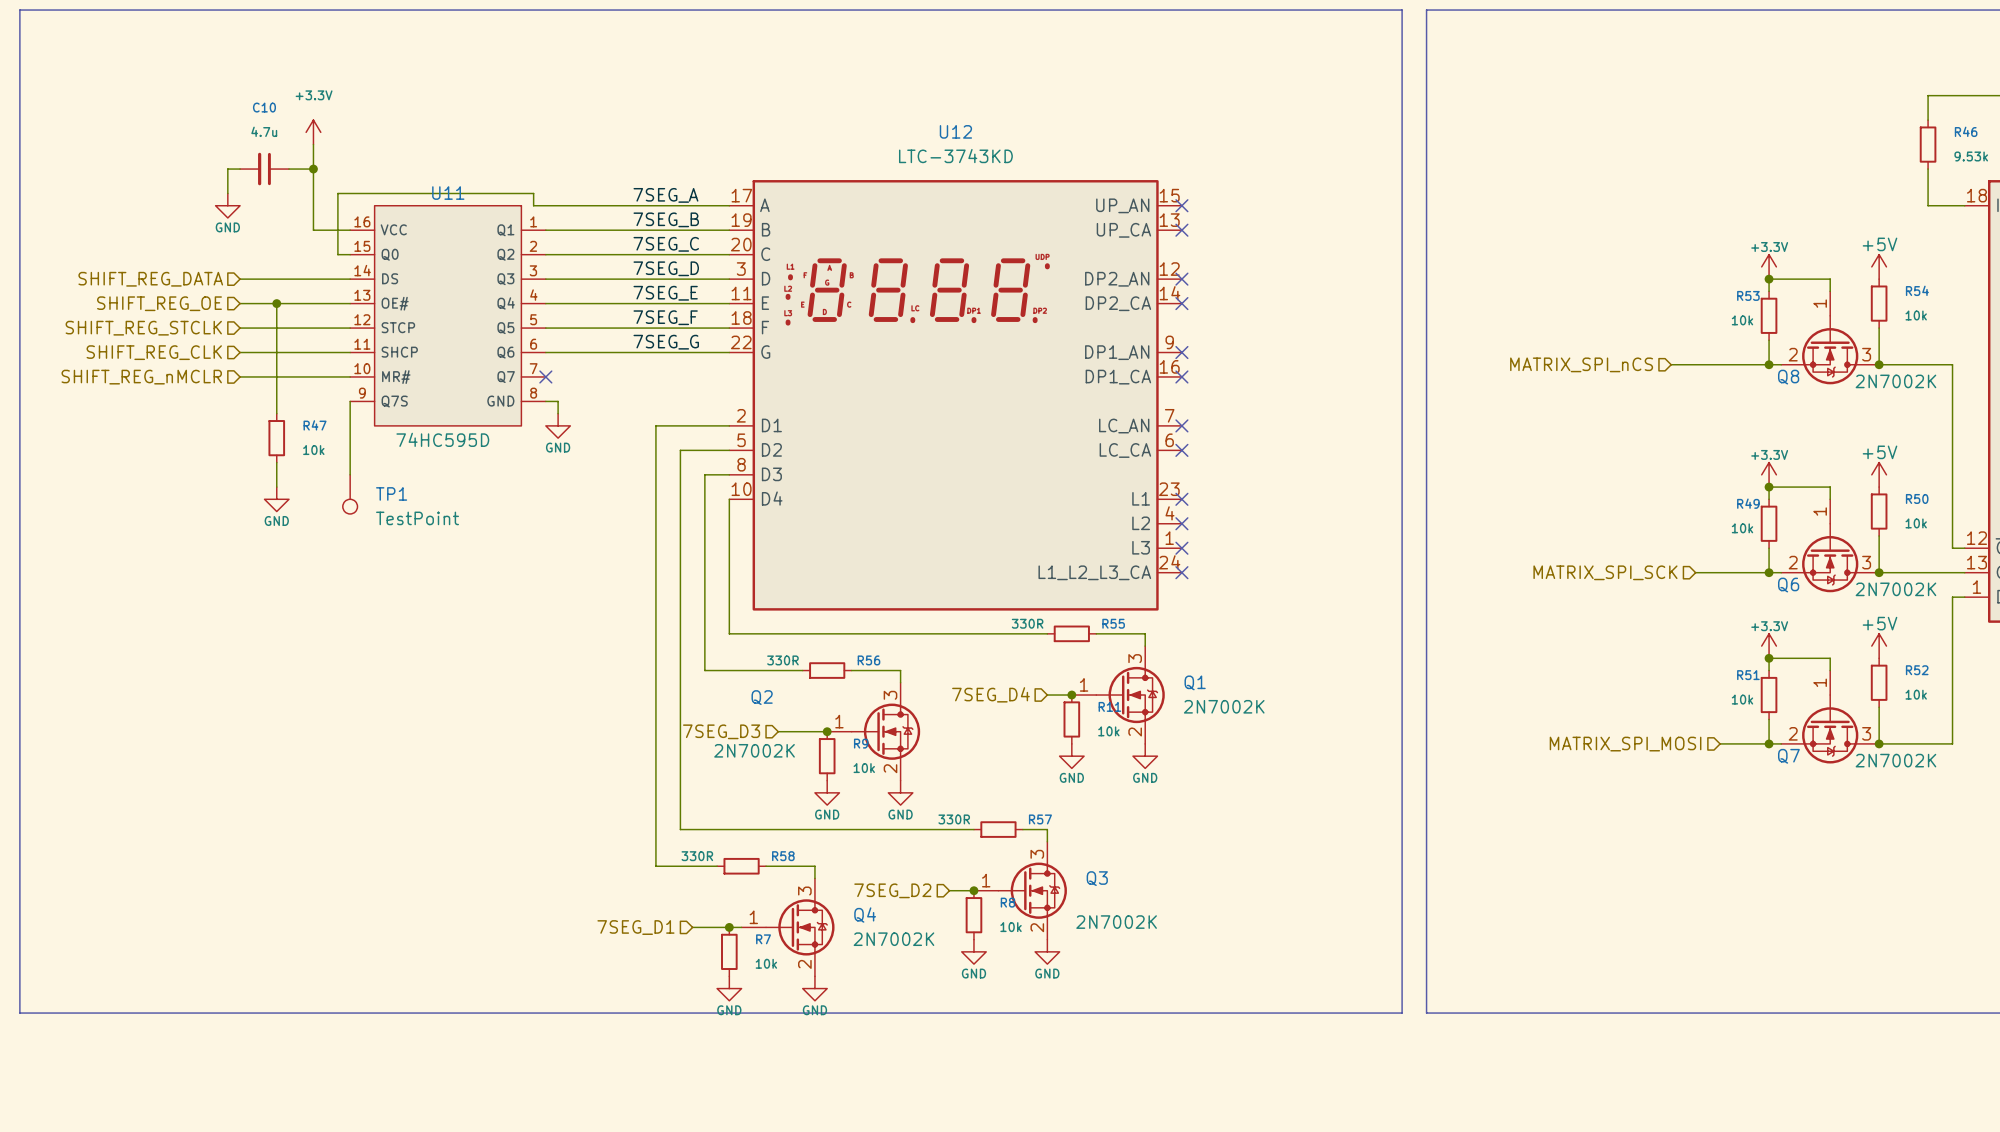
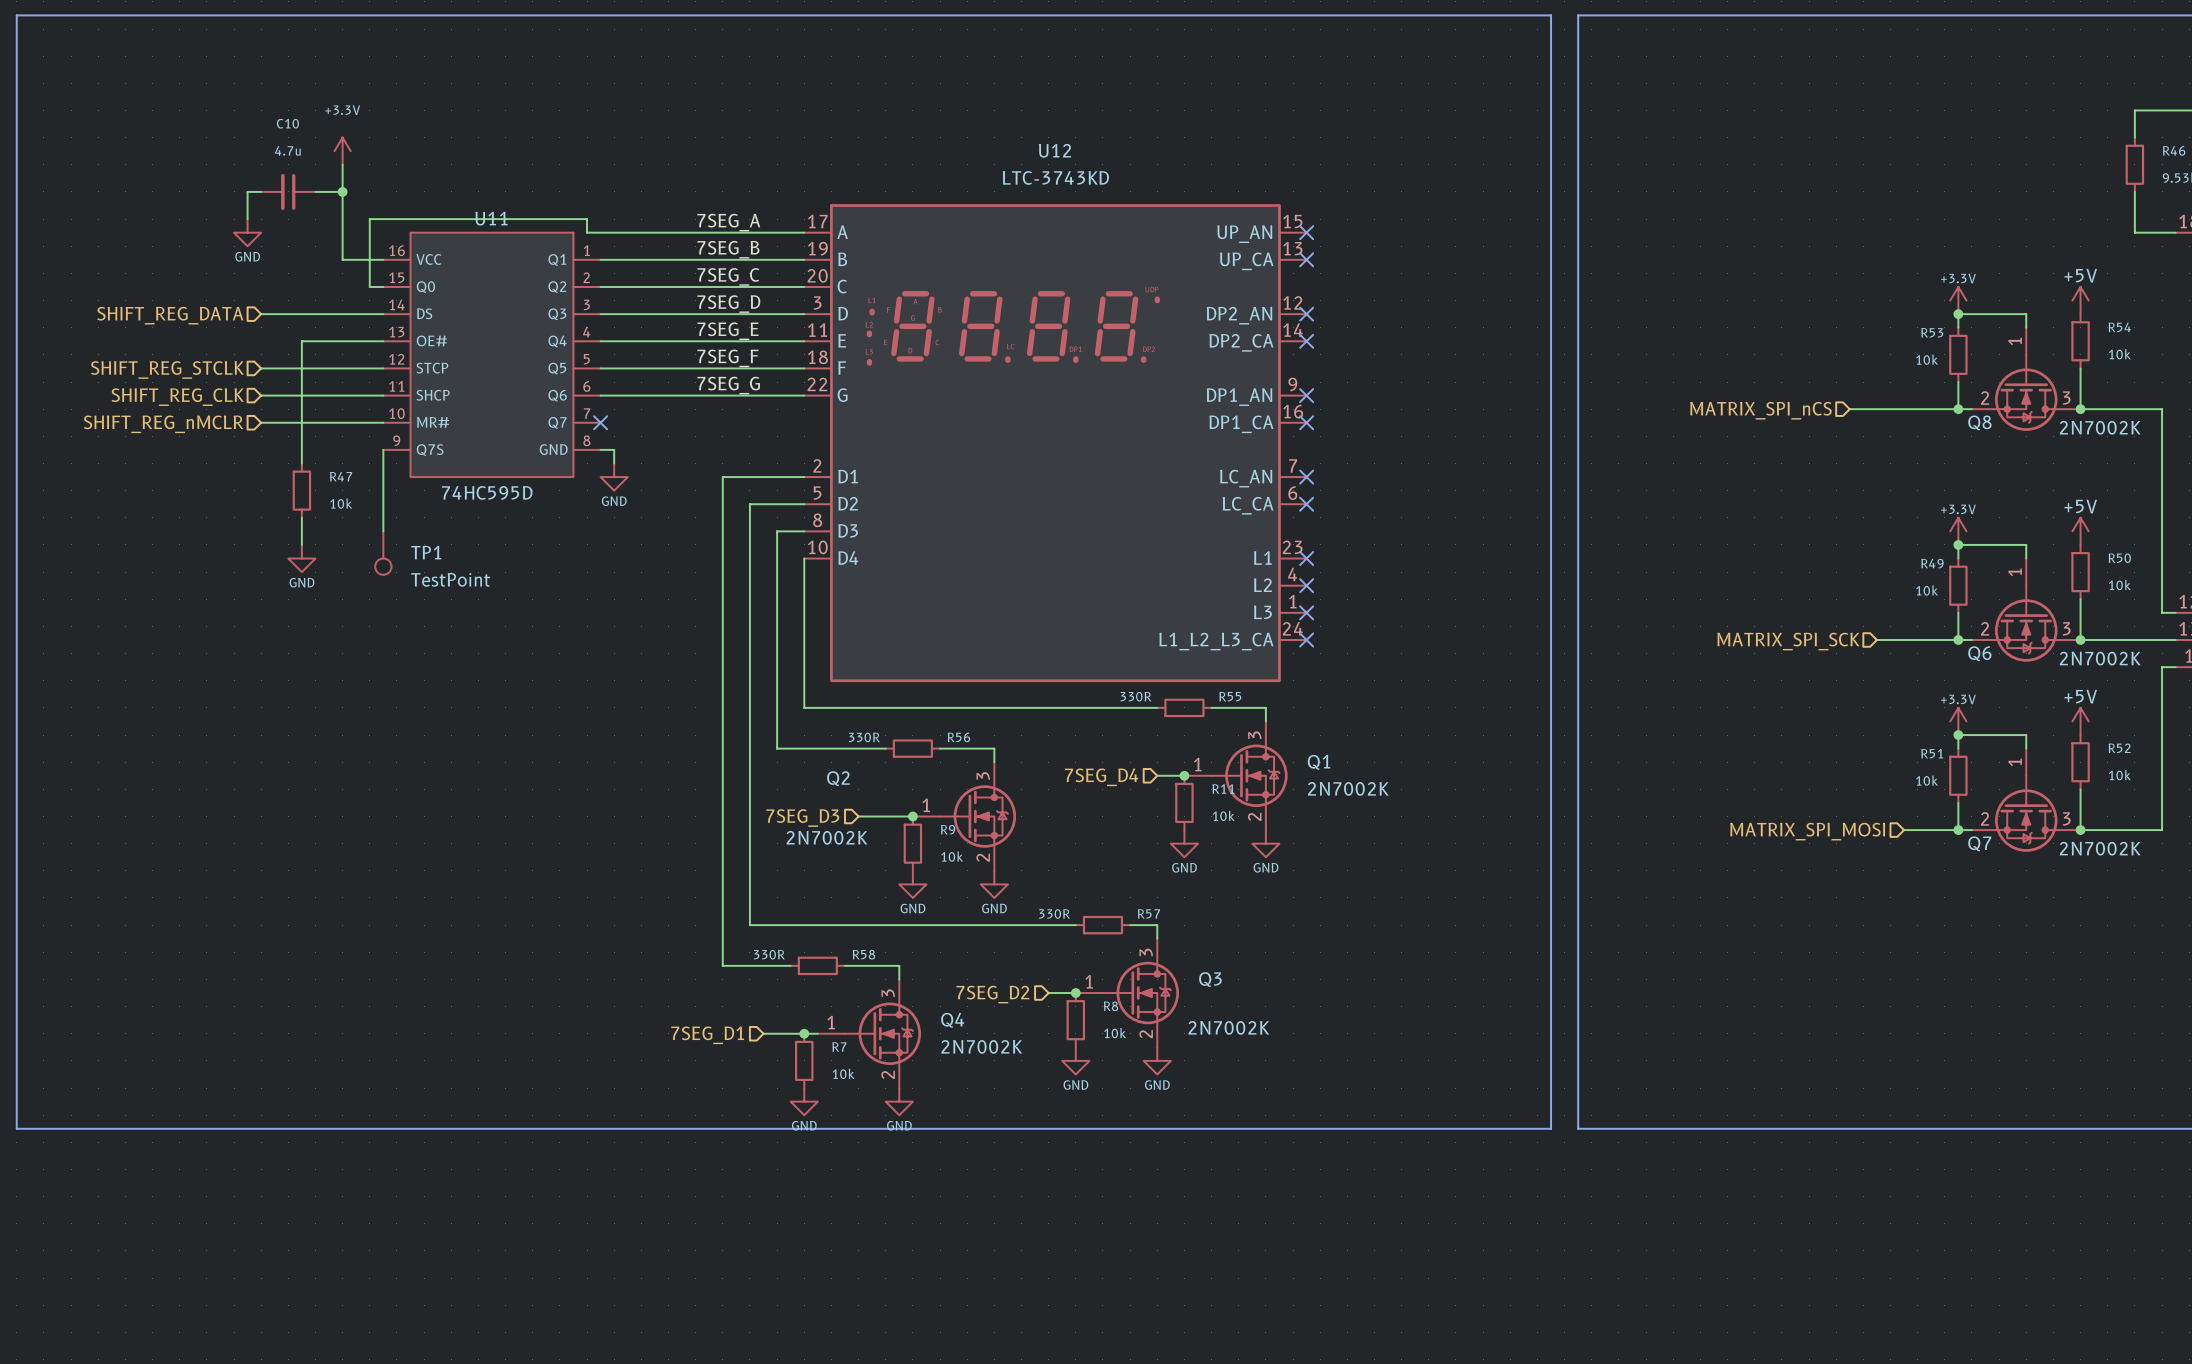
hierarchical label: SHIFT_REG_OE (159, 303) -> none
wire: (240, 303) (276, 303) -> none
junction: (276, 303) -> none

